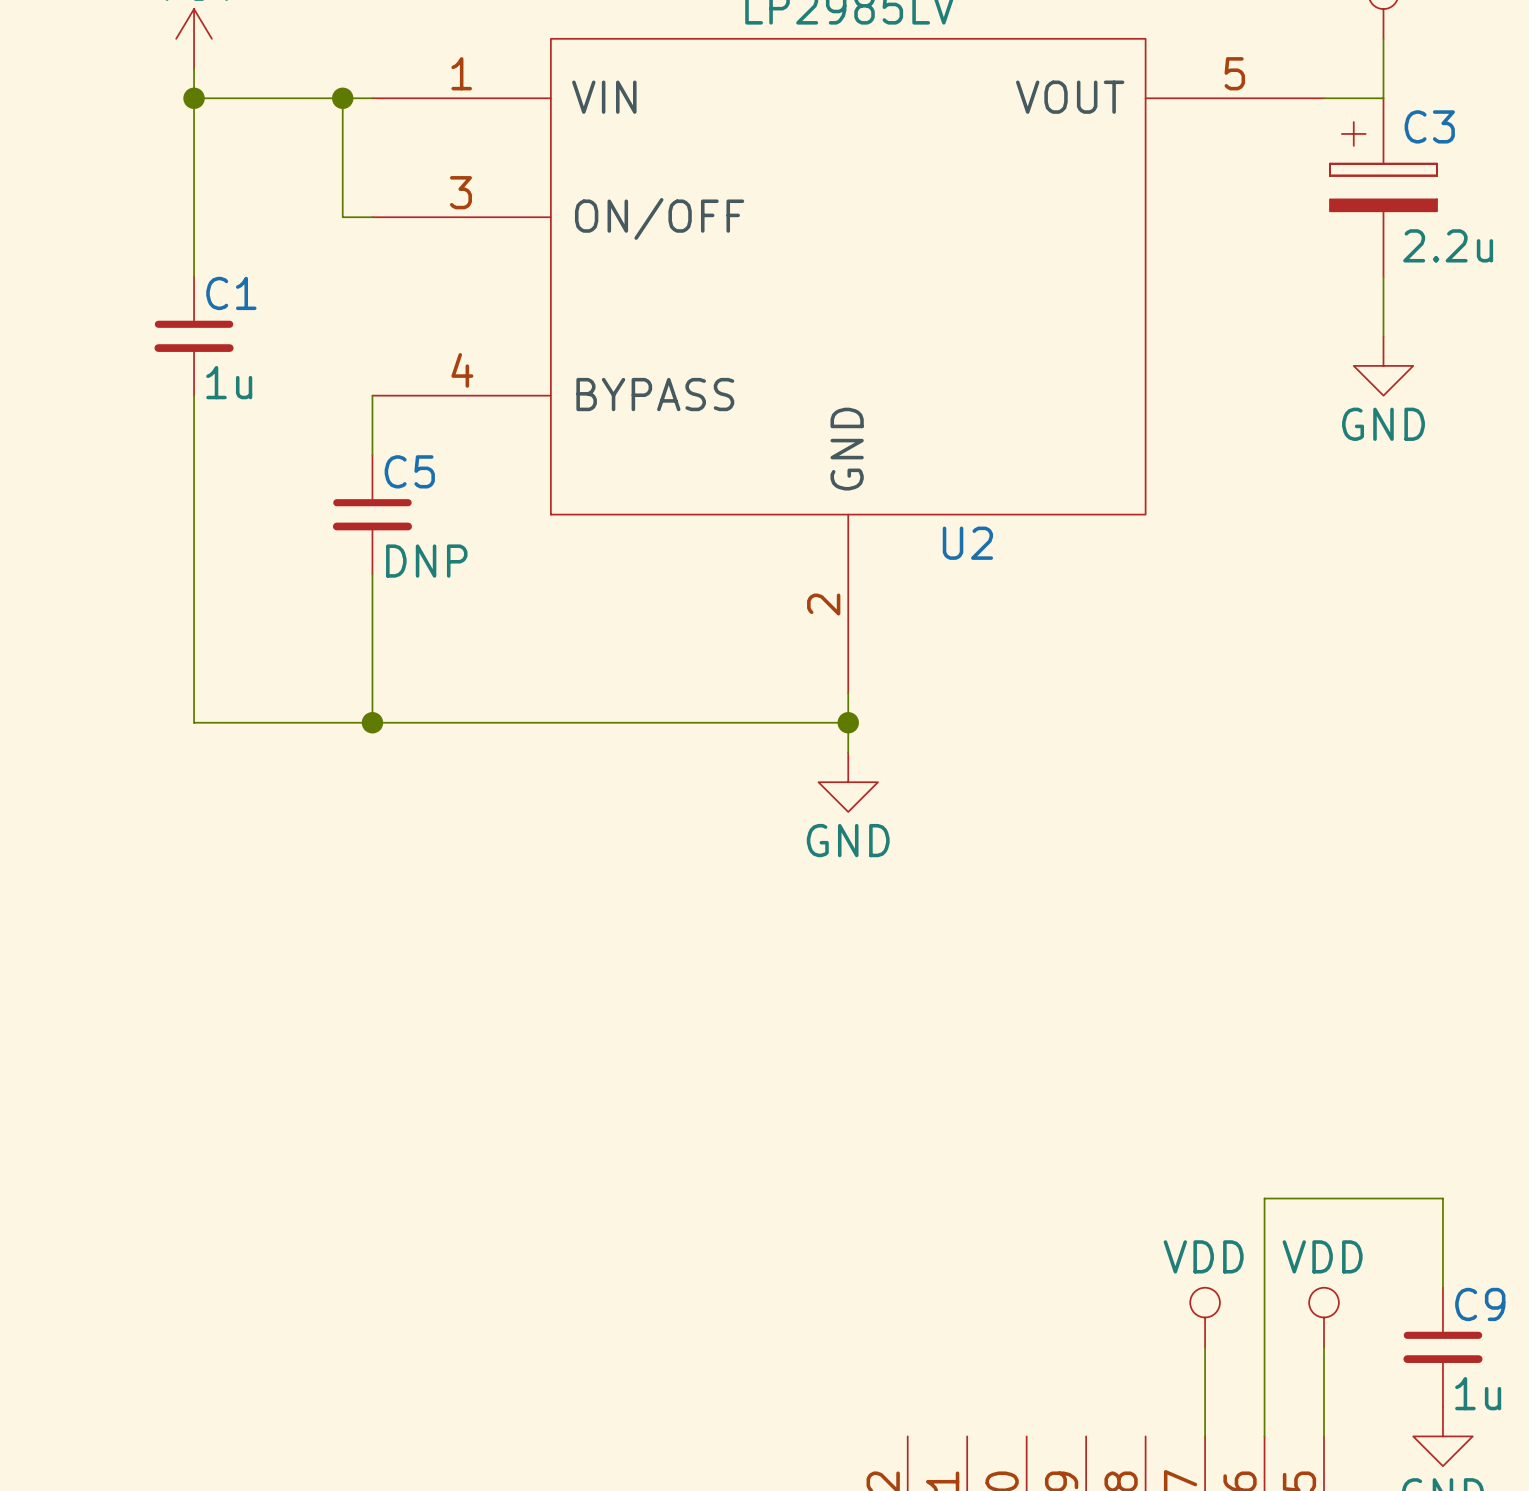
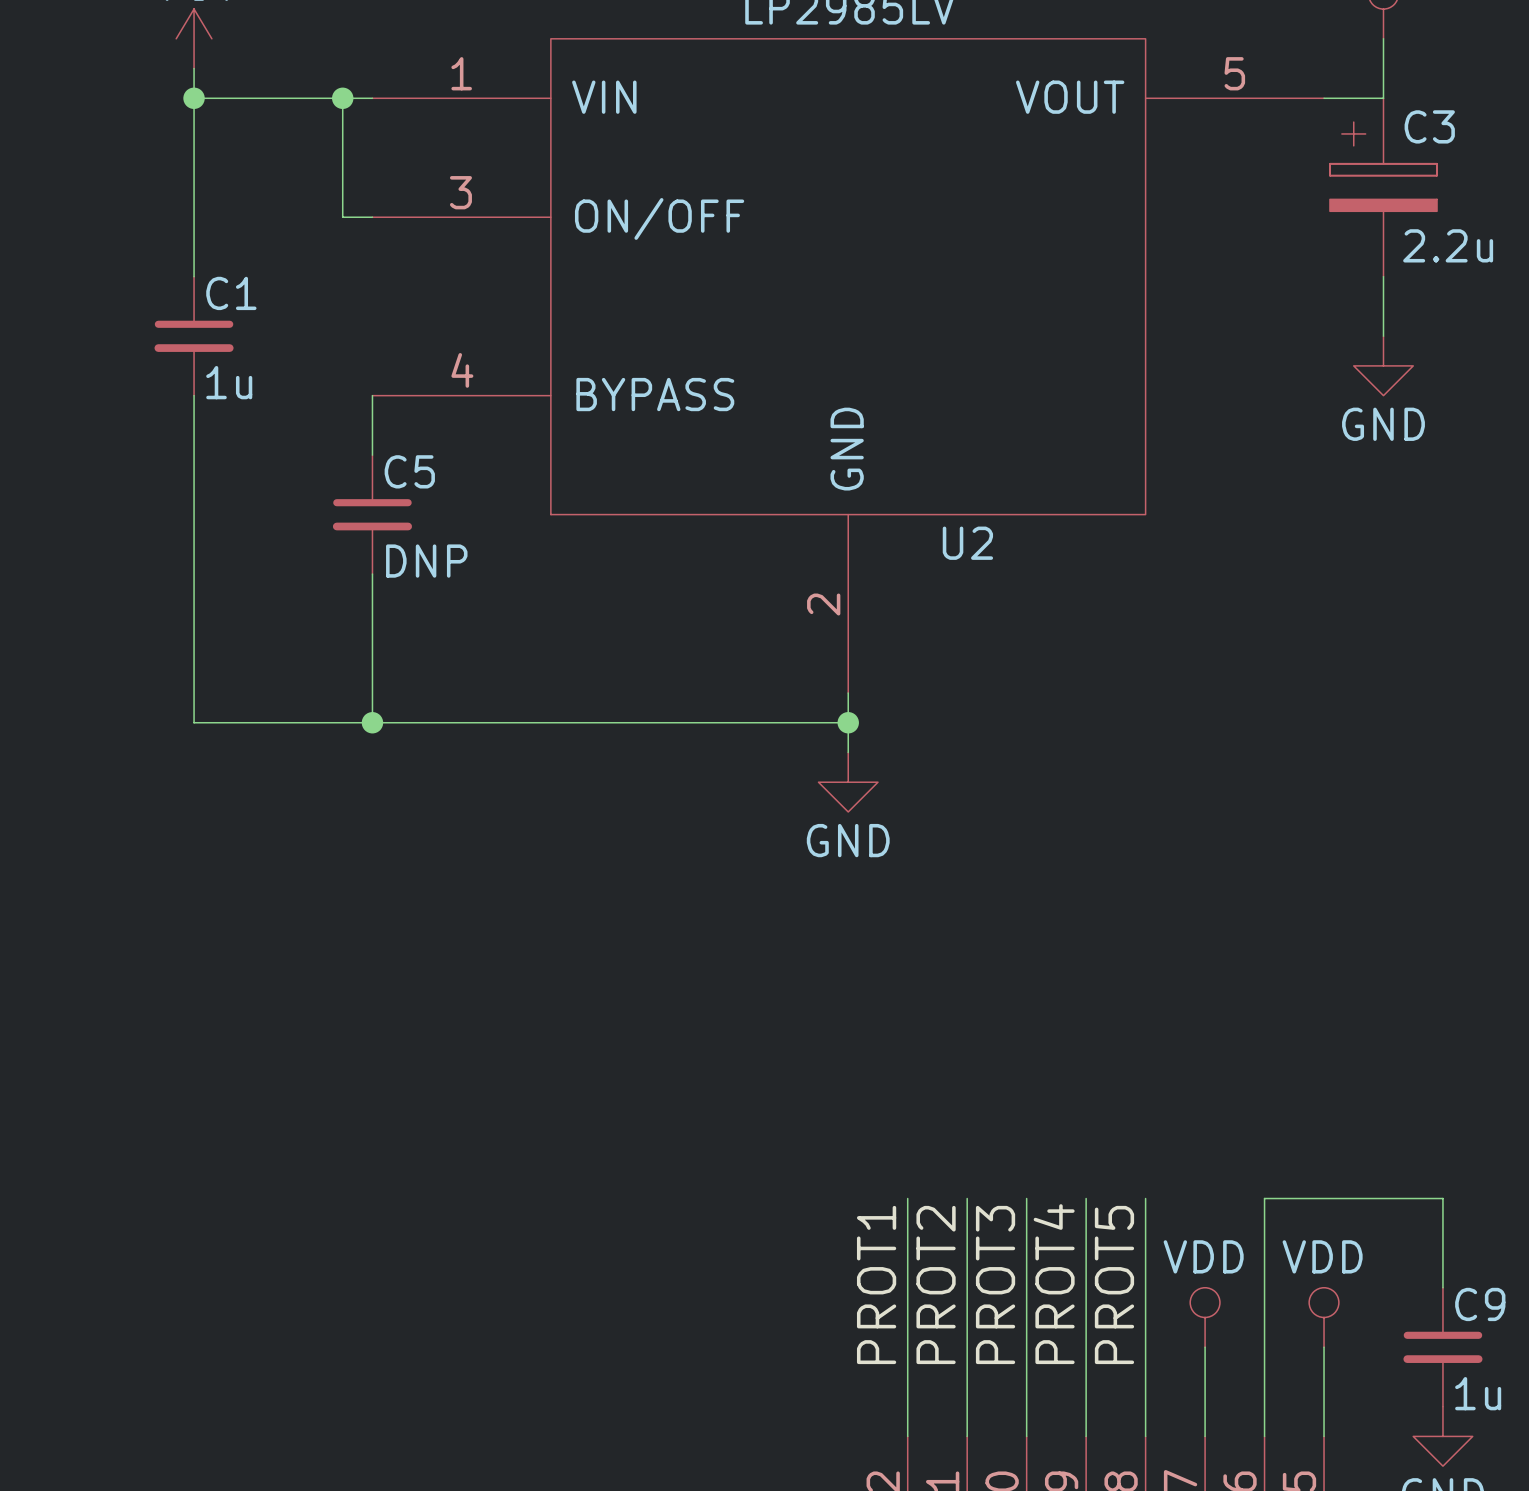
wire: none -> (907, 1198) (907, 1436)
wire: none -> (967, 1198) (967, 1436)
wire: none -> (1026, 1198) (1026, 1436)
wire: none -> (1086, 1198) (1086, 1436)
wire: none -> (1145, 1198) (1145, 1436)
label: none -> PROT1 (876, 1284)
label: none -> PROT2 (936, 1284)
label: none -> PROT3 (995, 1284)
label: none -> PROT4 (1054, 1284)
label: none -> PROT5 (1114, 1284)

